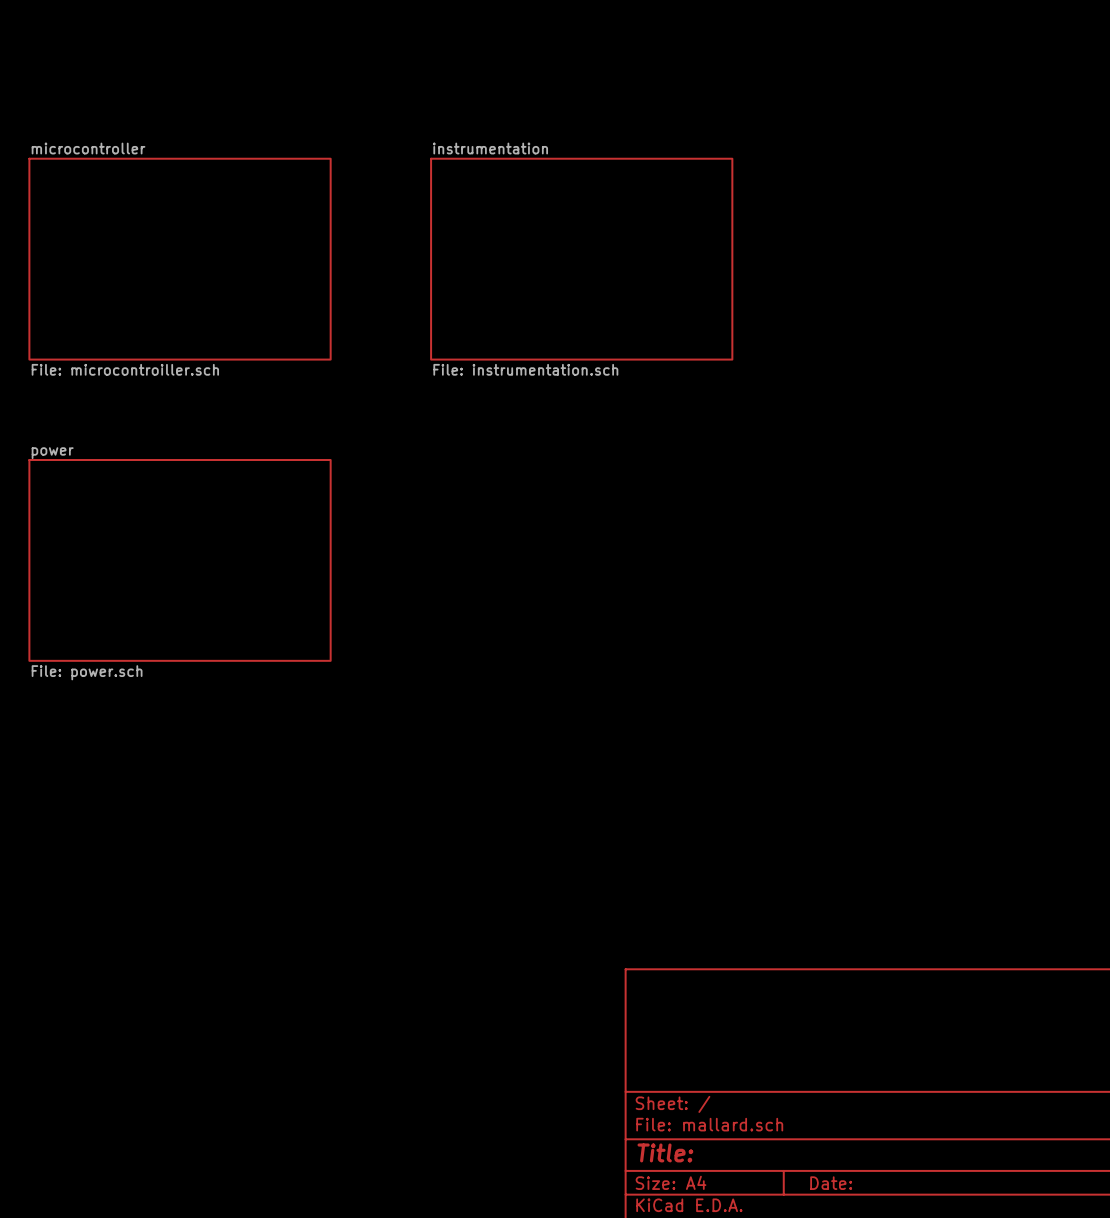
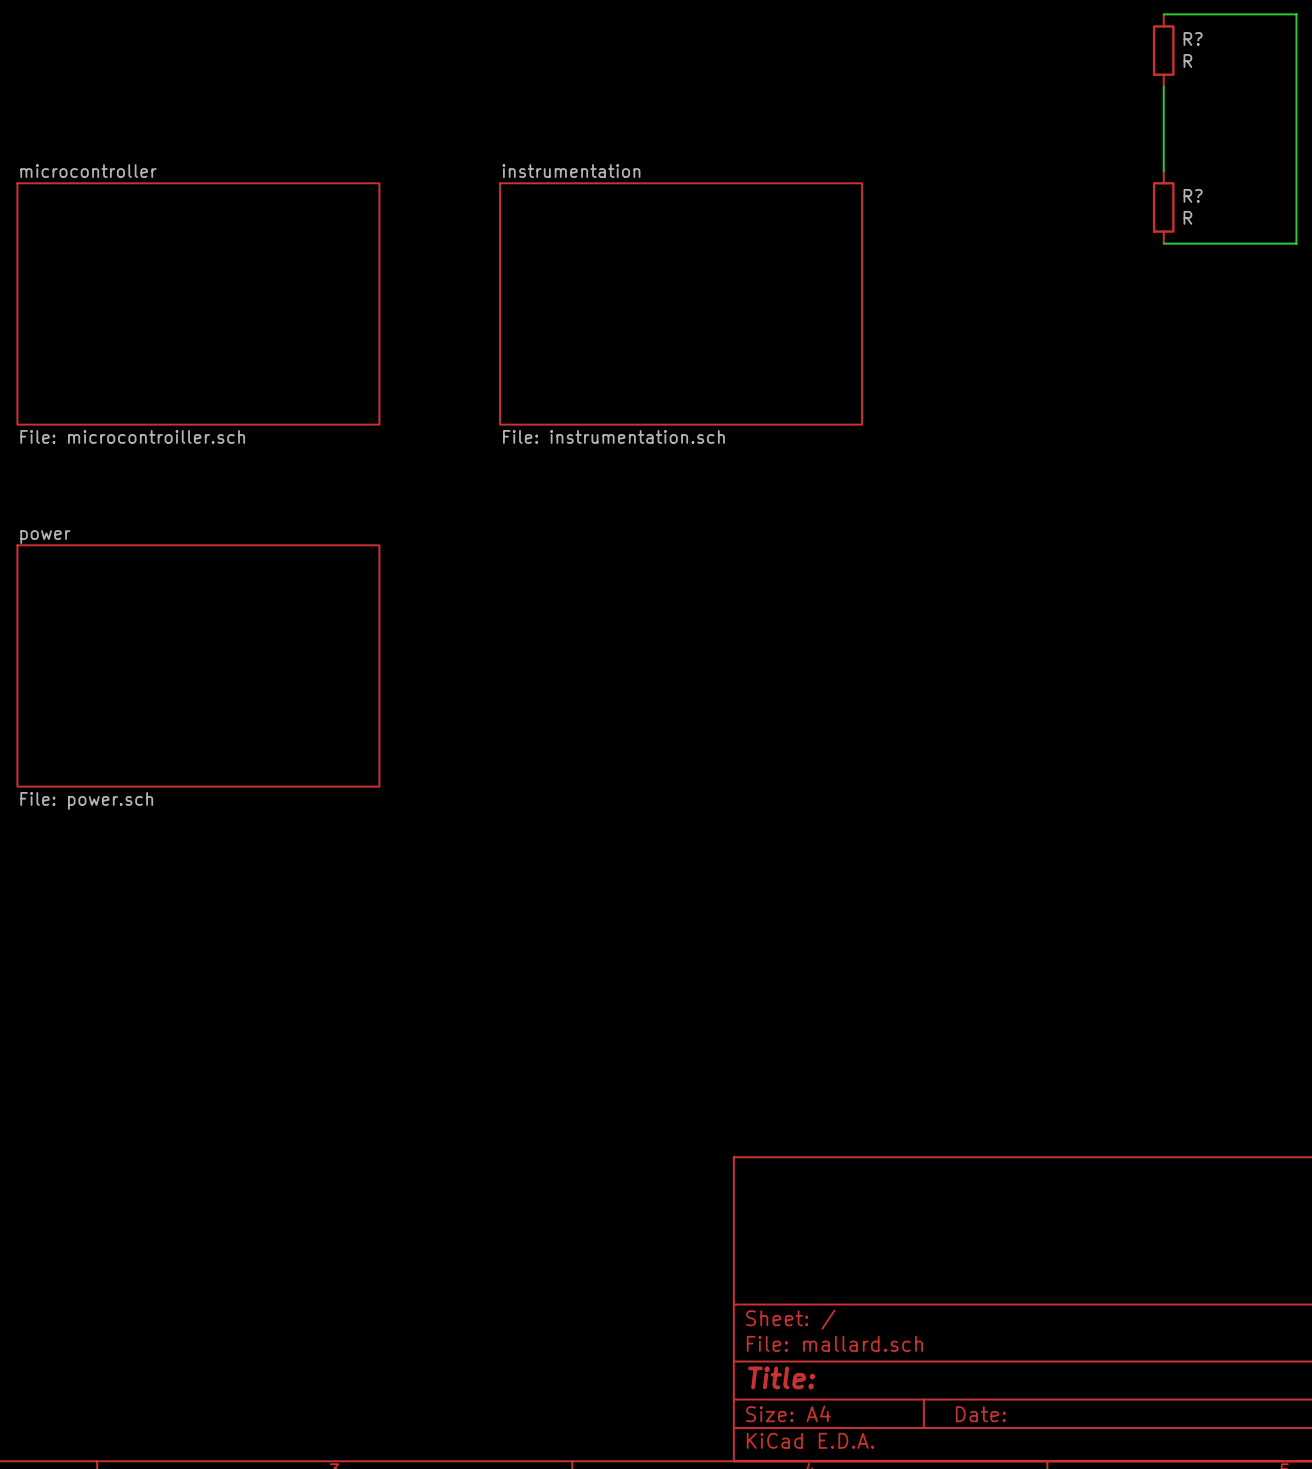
wire: none -> (1163, 14) (1296, 14) (1296, 243) (1163, 243)
R?: none -> R (1163, 50)
wire: none -> (1163, 86) (1163, 171)
R?: none -> R (1163, 207)

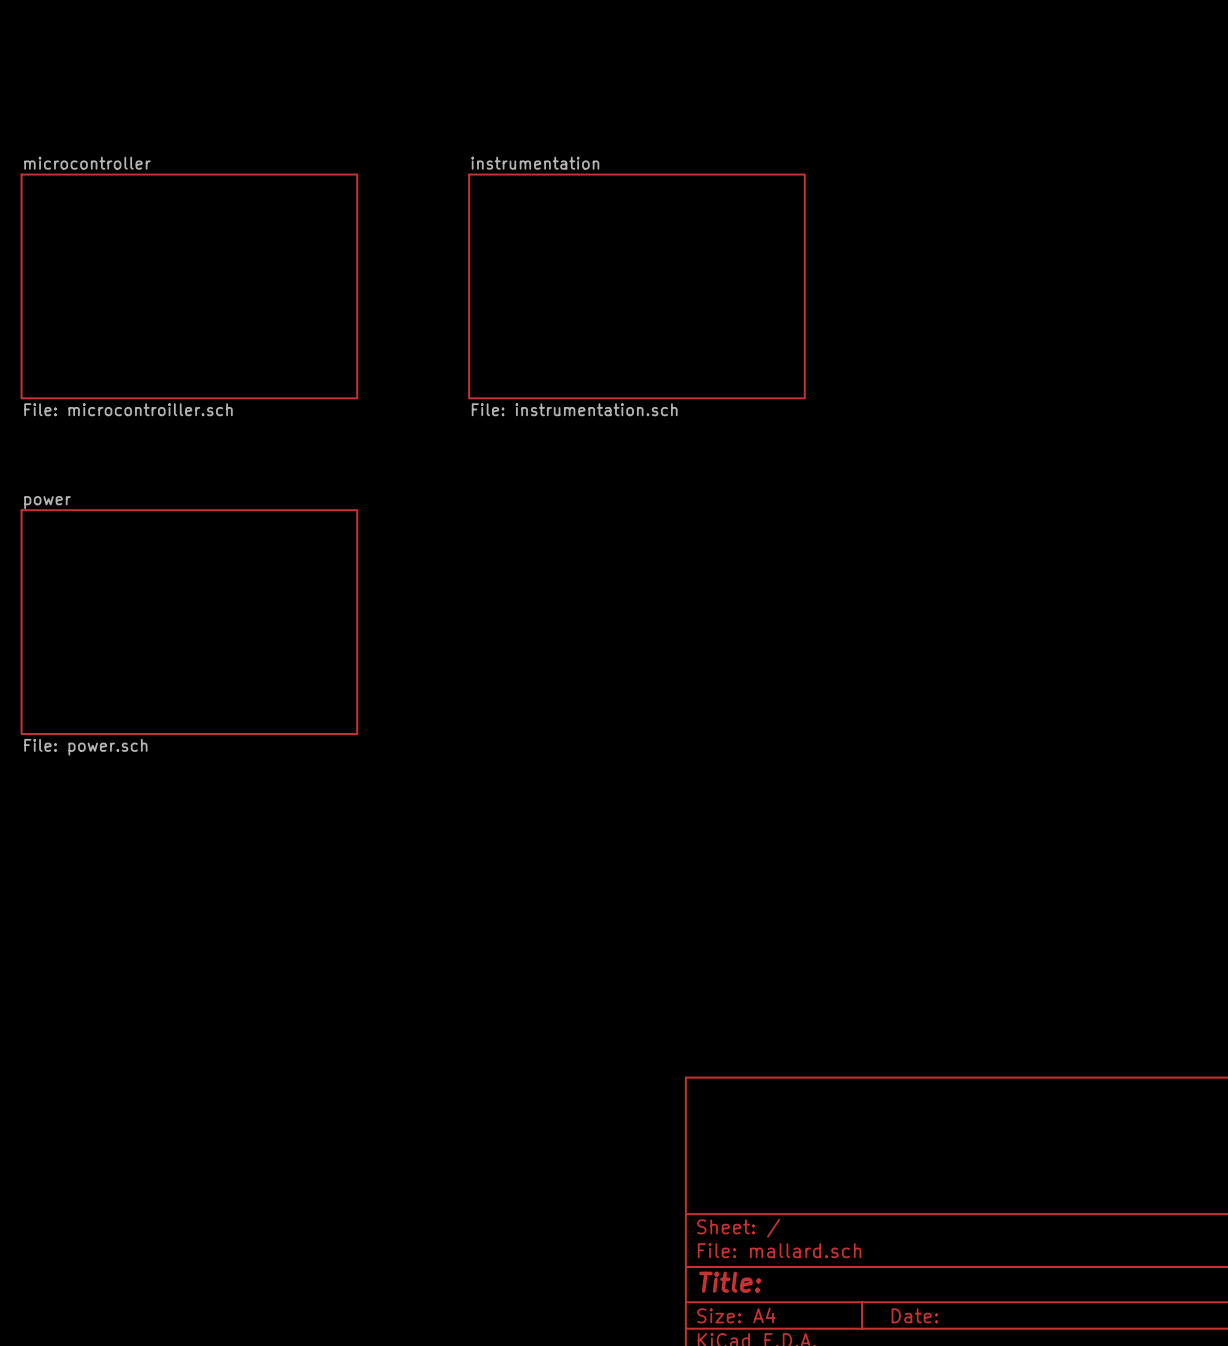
wire: (1163, 14) (1296, 14) (1296, 243) (1163, 243) -> none
R?: R (1163, 50) -> none
wire: (1163, 86) (1163, 171) -> none
R?: R (1163, 207) -> none

